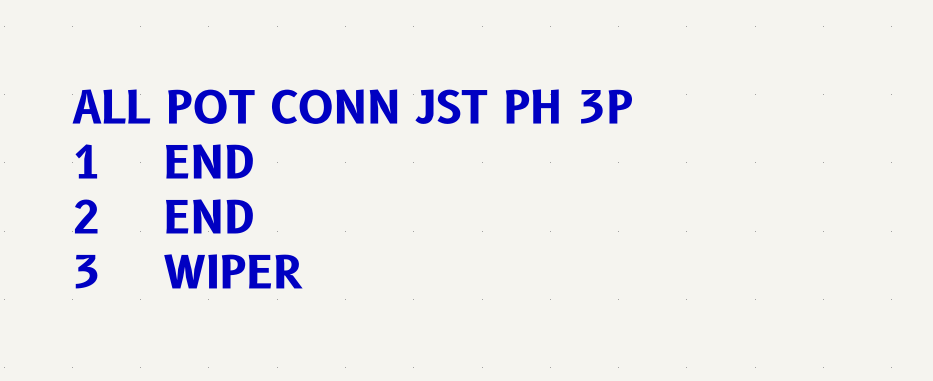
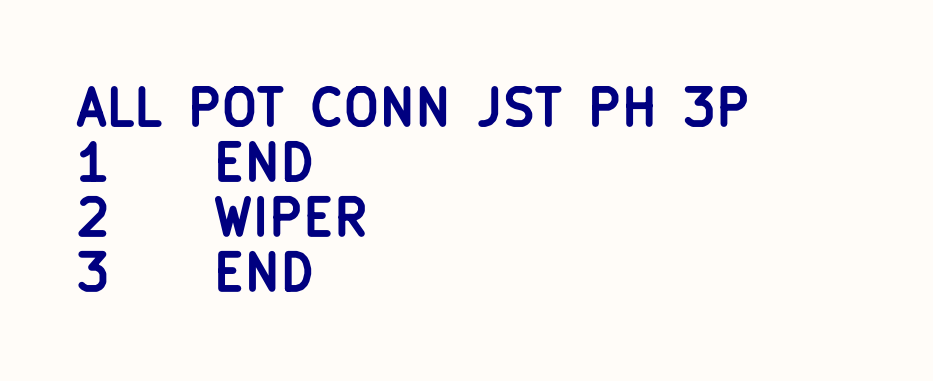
text: 2 END (163, 216) -> 2 WIPER (221, 216)
text: 3 WIPER (189, 271) -> 3 END (194, 271)

